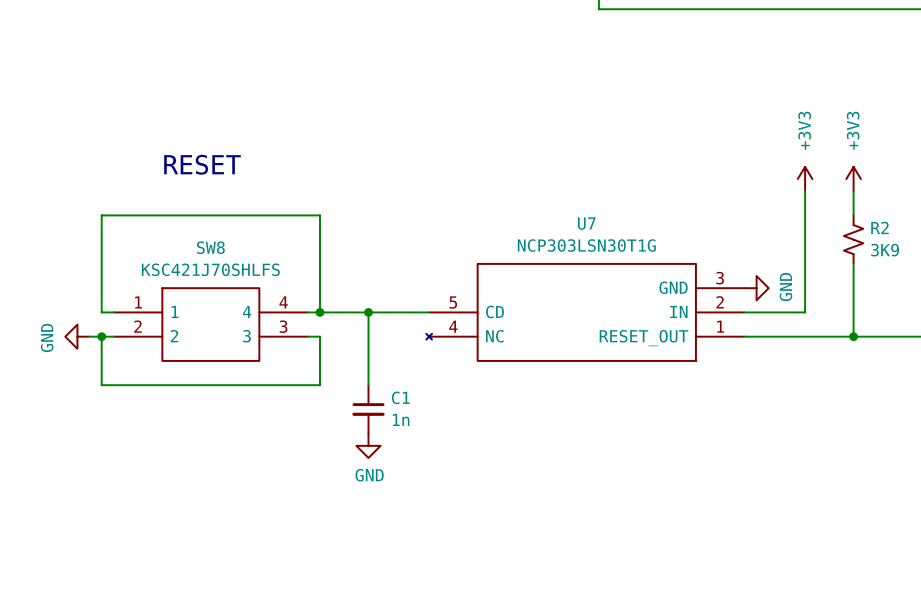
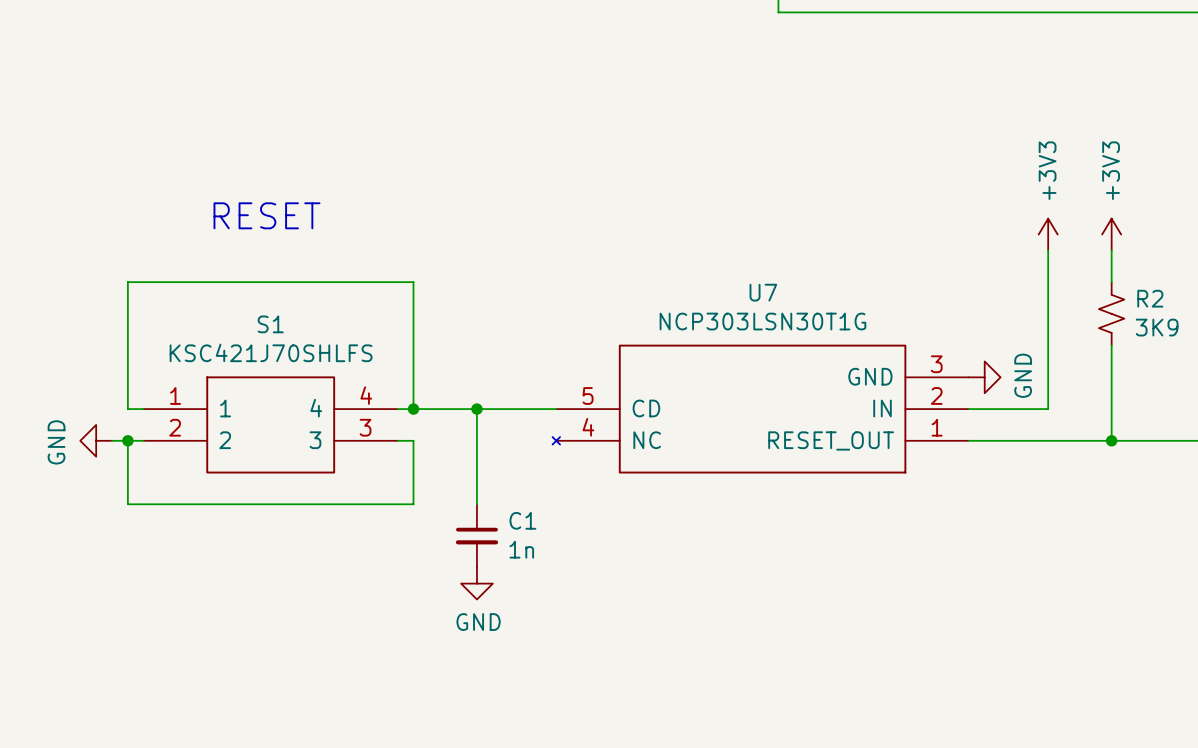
SW8 name: SW8 (210, 247) -> S1 (270, 324)

